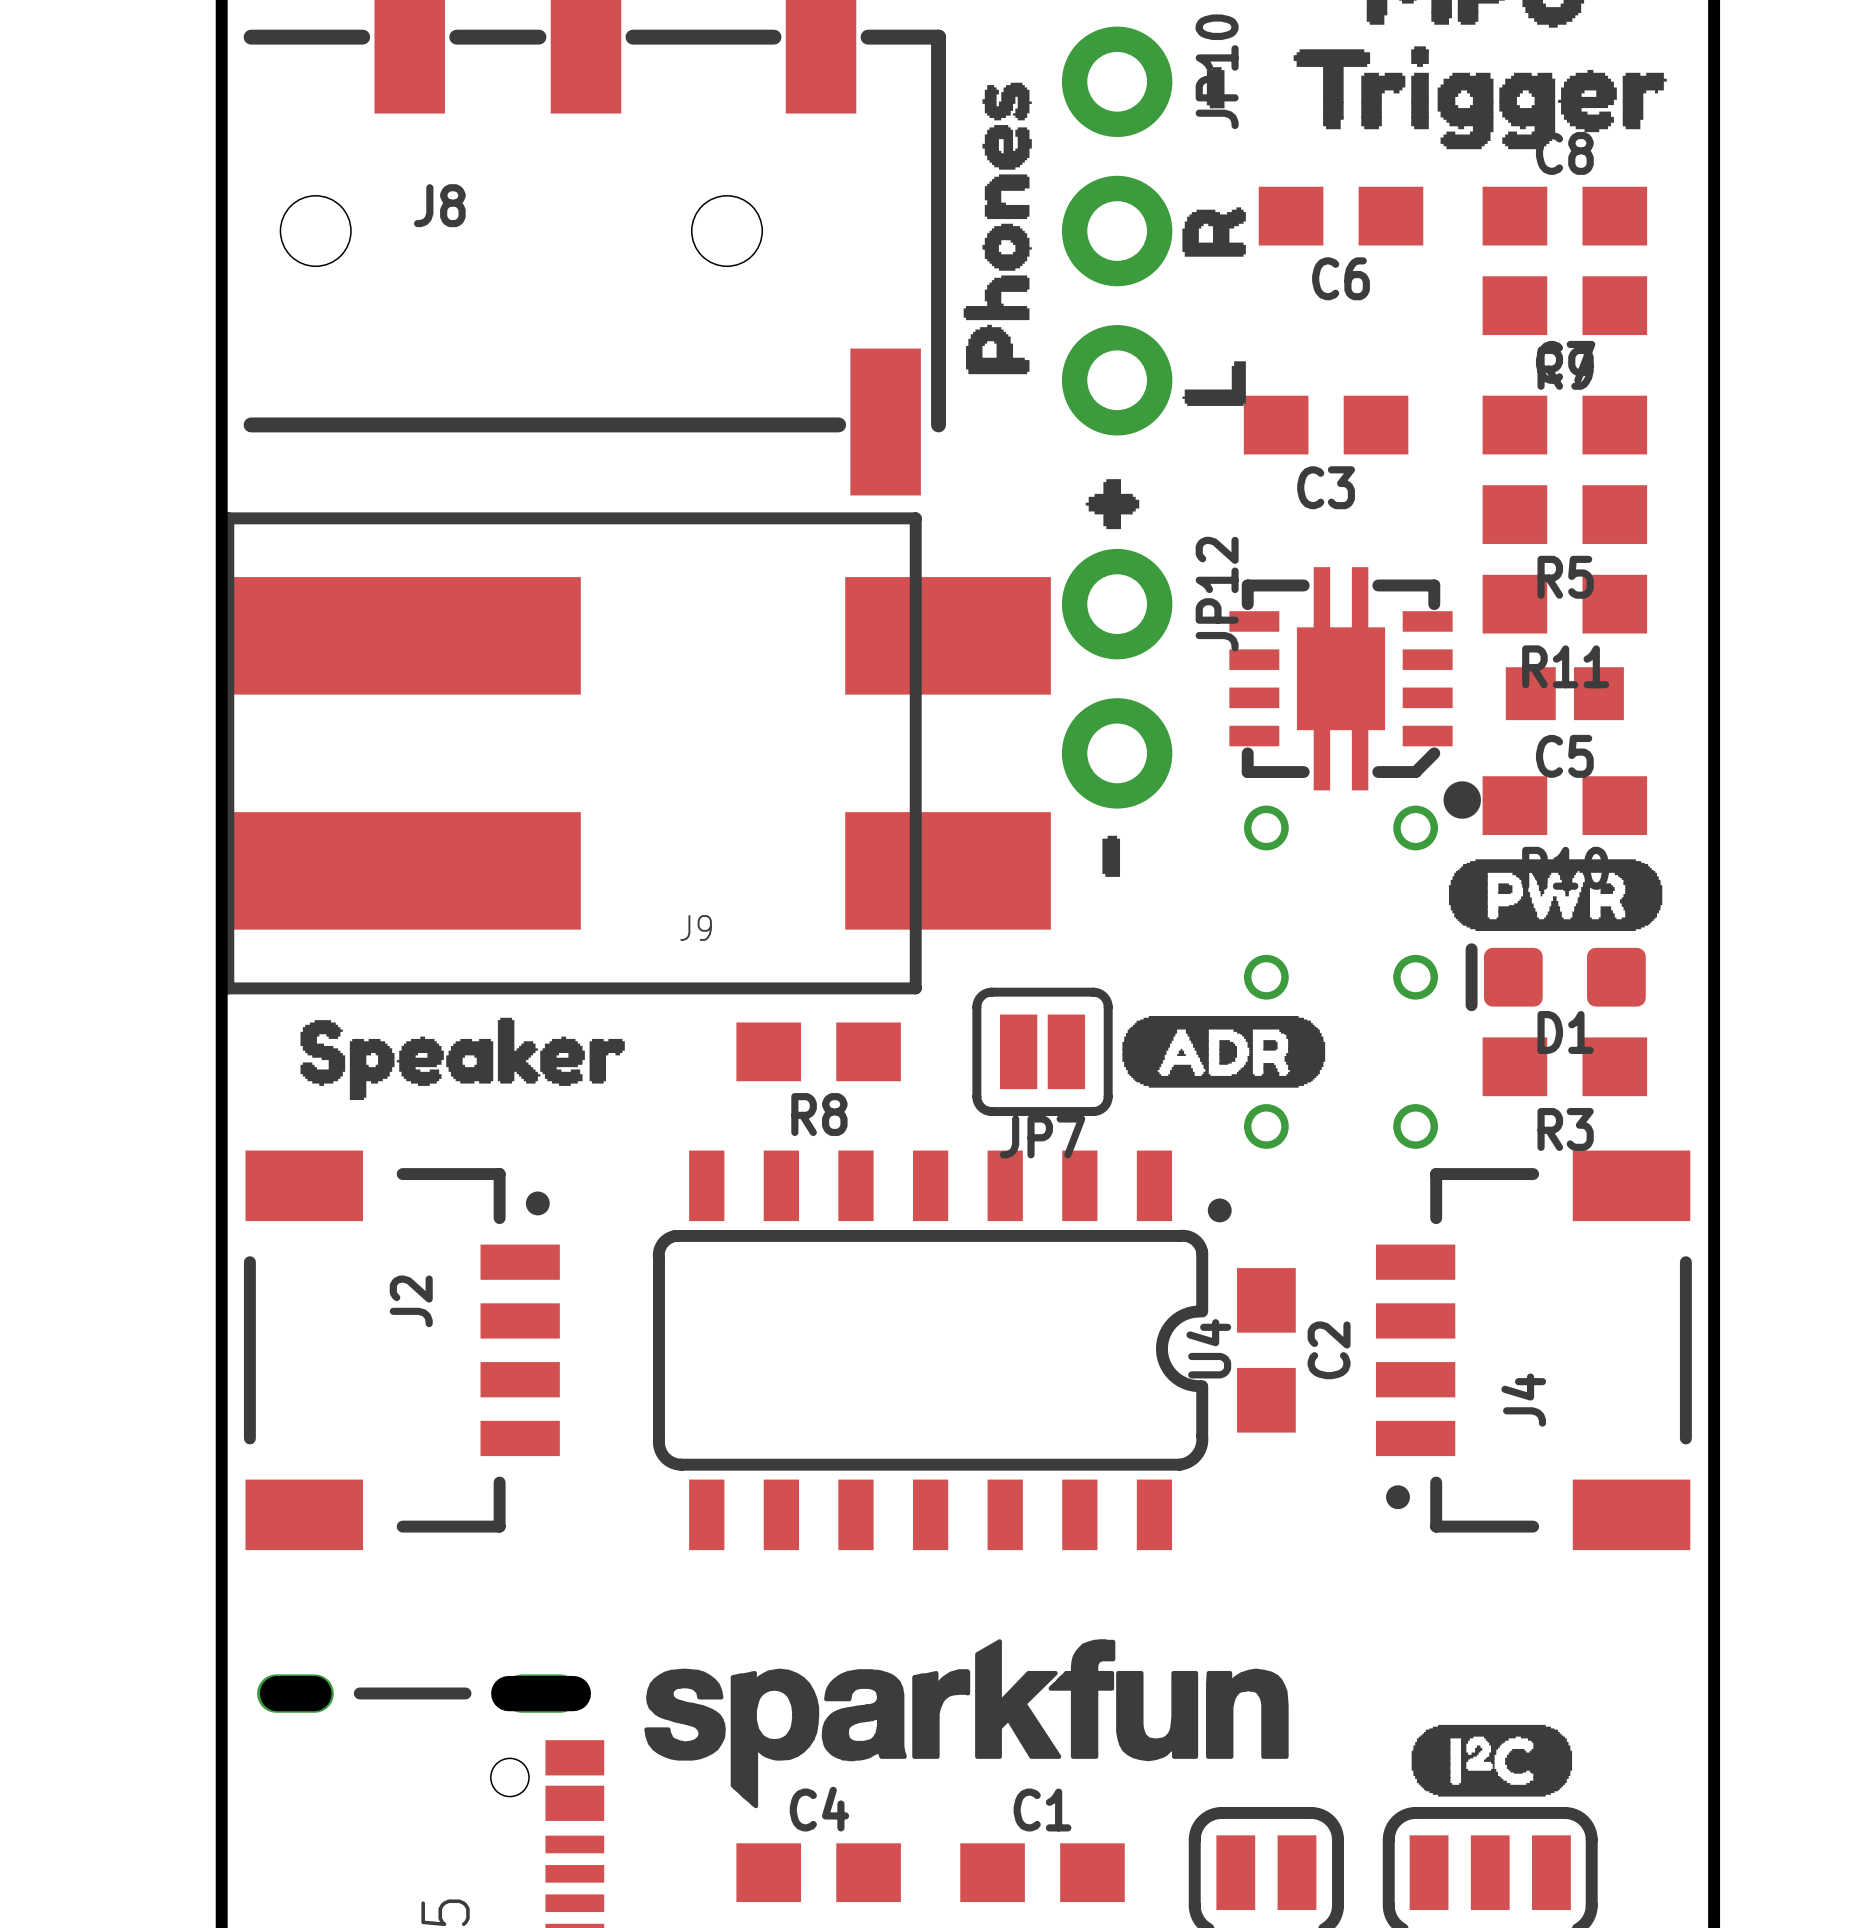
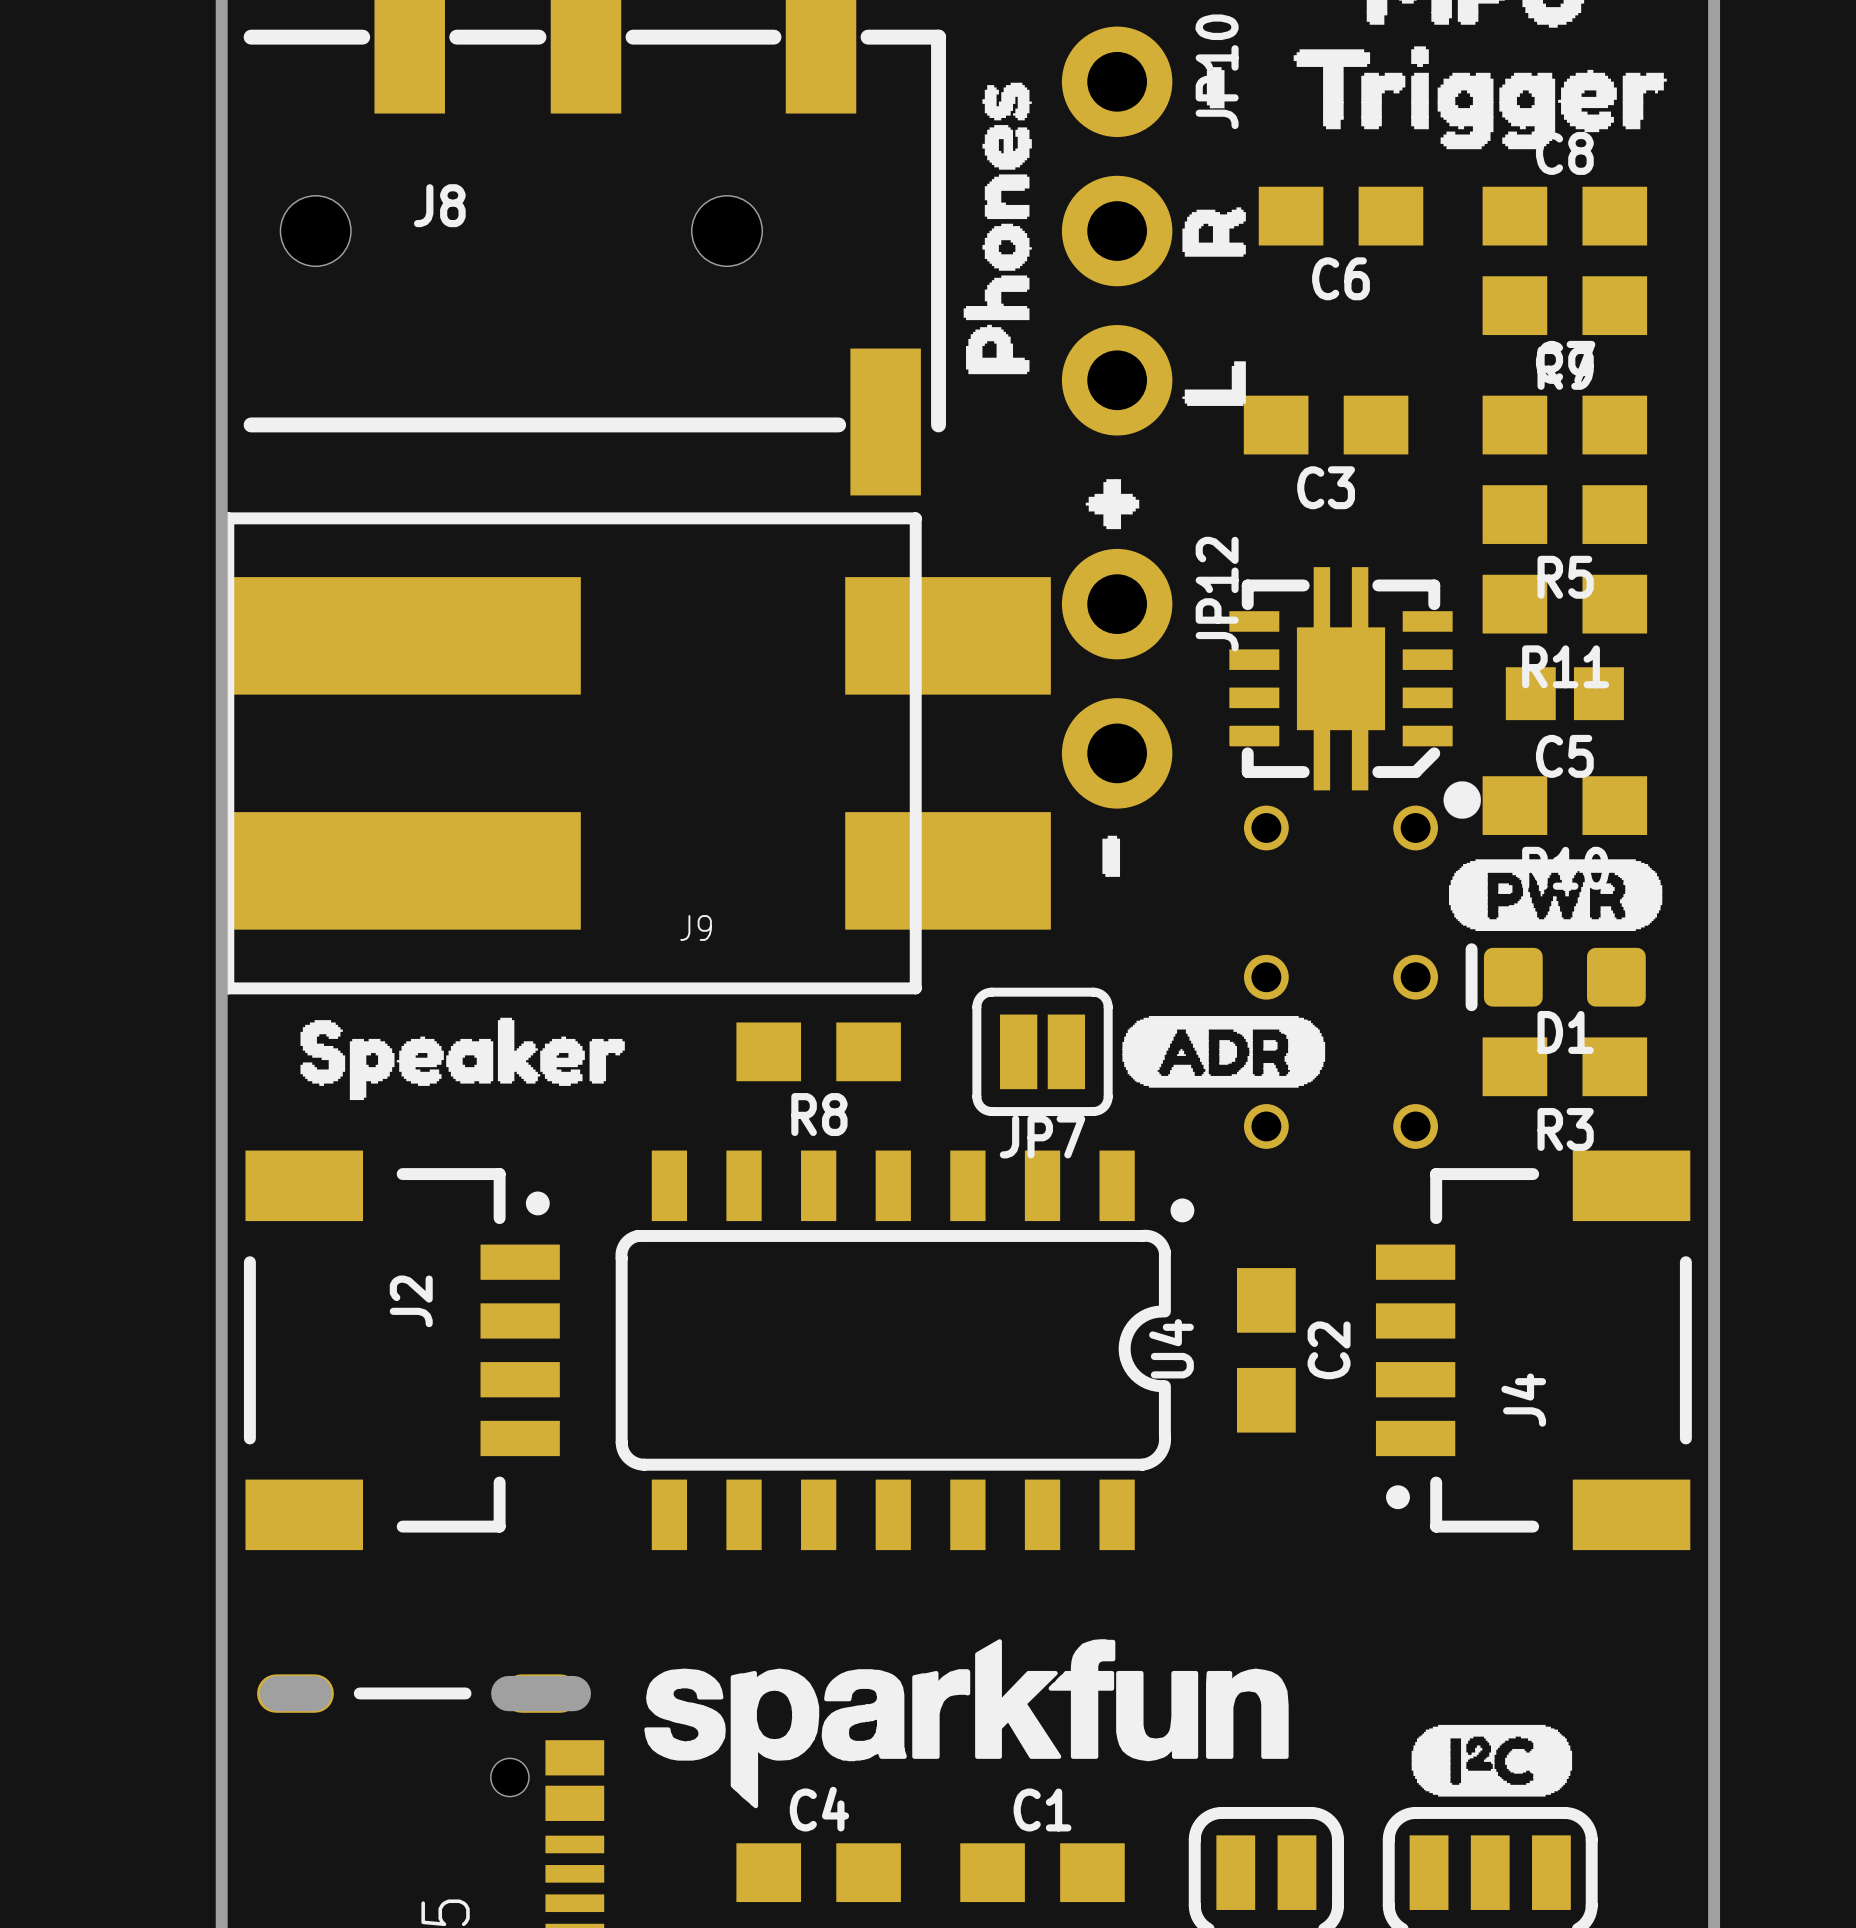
U4 position: (942, 1350) -> (904, 1350)

